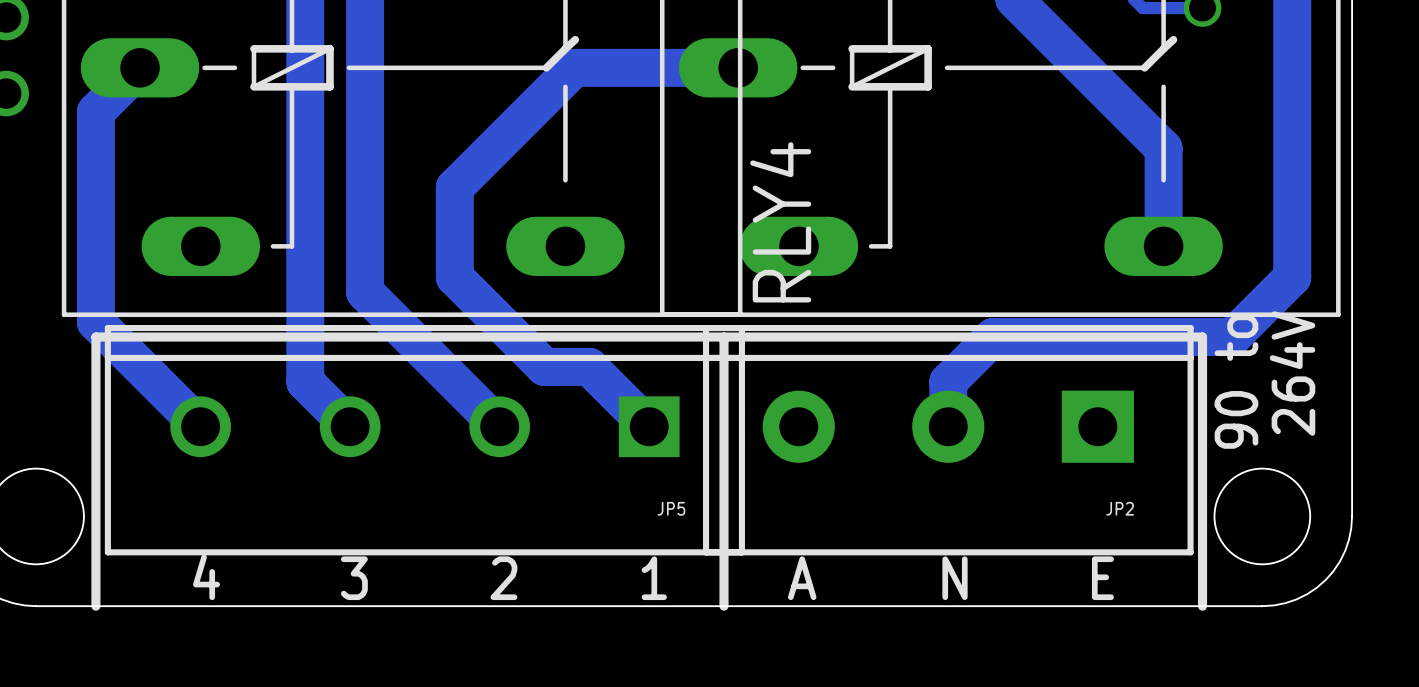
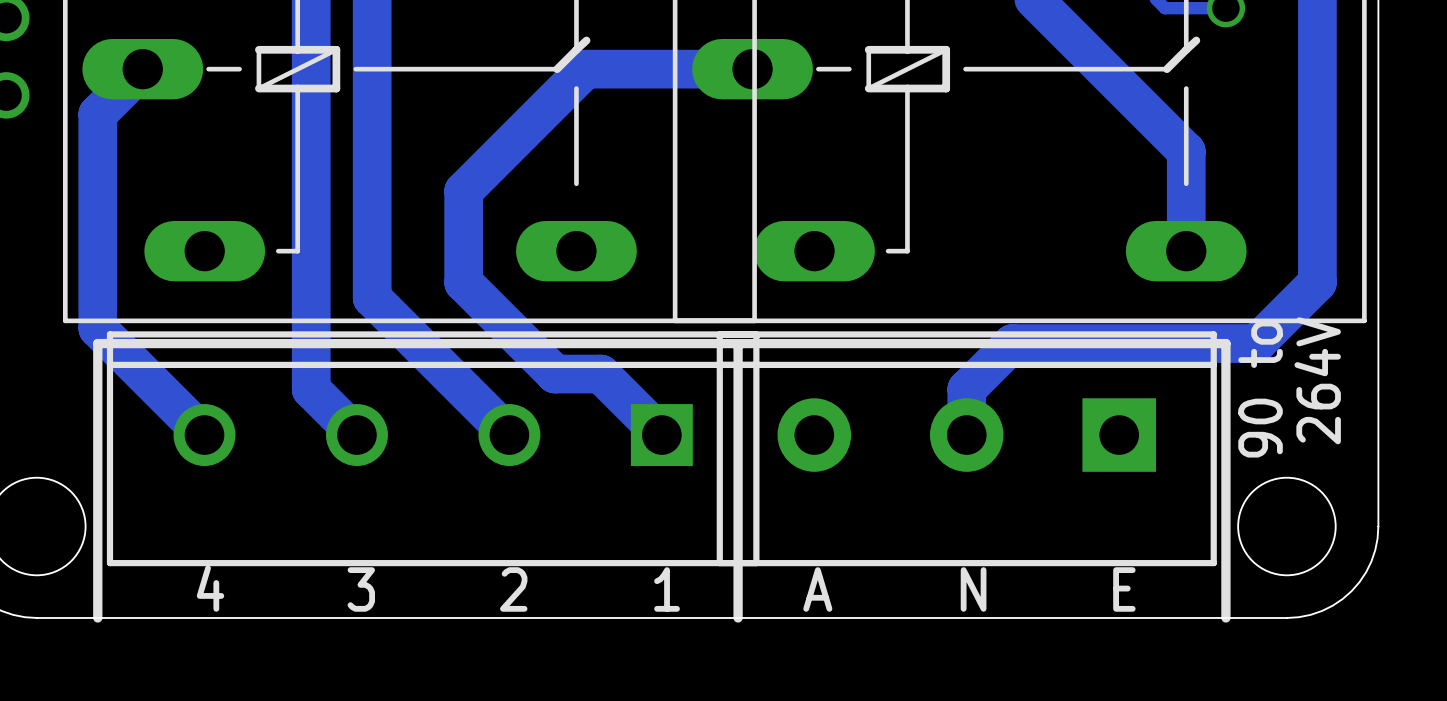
RLY4 name: RLY4 (780, 222) -> none
JP5 name: JP5 (671, 508) -> none
JP2 name: JP2 (1120, 508) -> none

